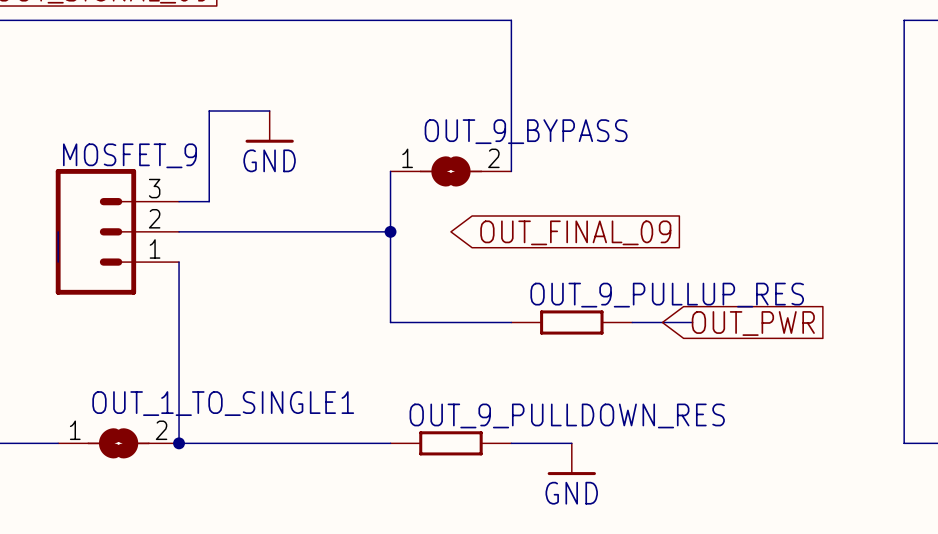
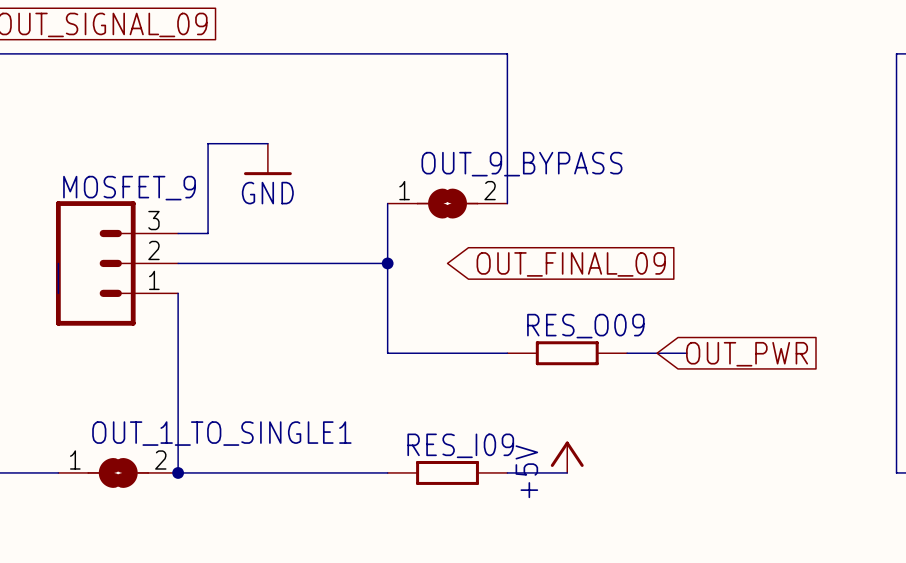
OUT_9_PULLUP_RES name: OUT_9_PULLUP_RES (667, 295) -> RES_O09 (585, 326)
OUT_9_PULLDOWN_RES name: OUT_9_PULLDOWN_RES (567, 415) -> RES_I09 (460, 445)
power symbol: none -> +5V (567, 457)
power symbol: GND (571, 459) -> none

